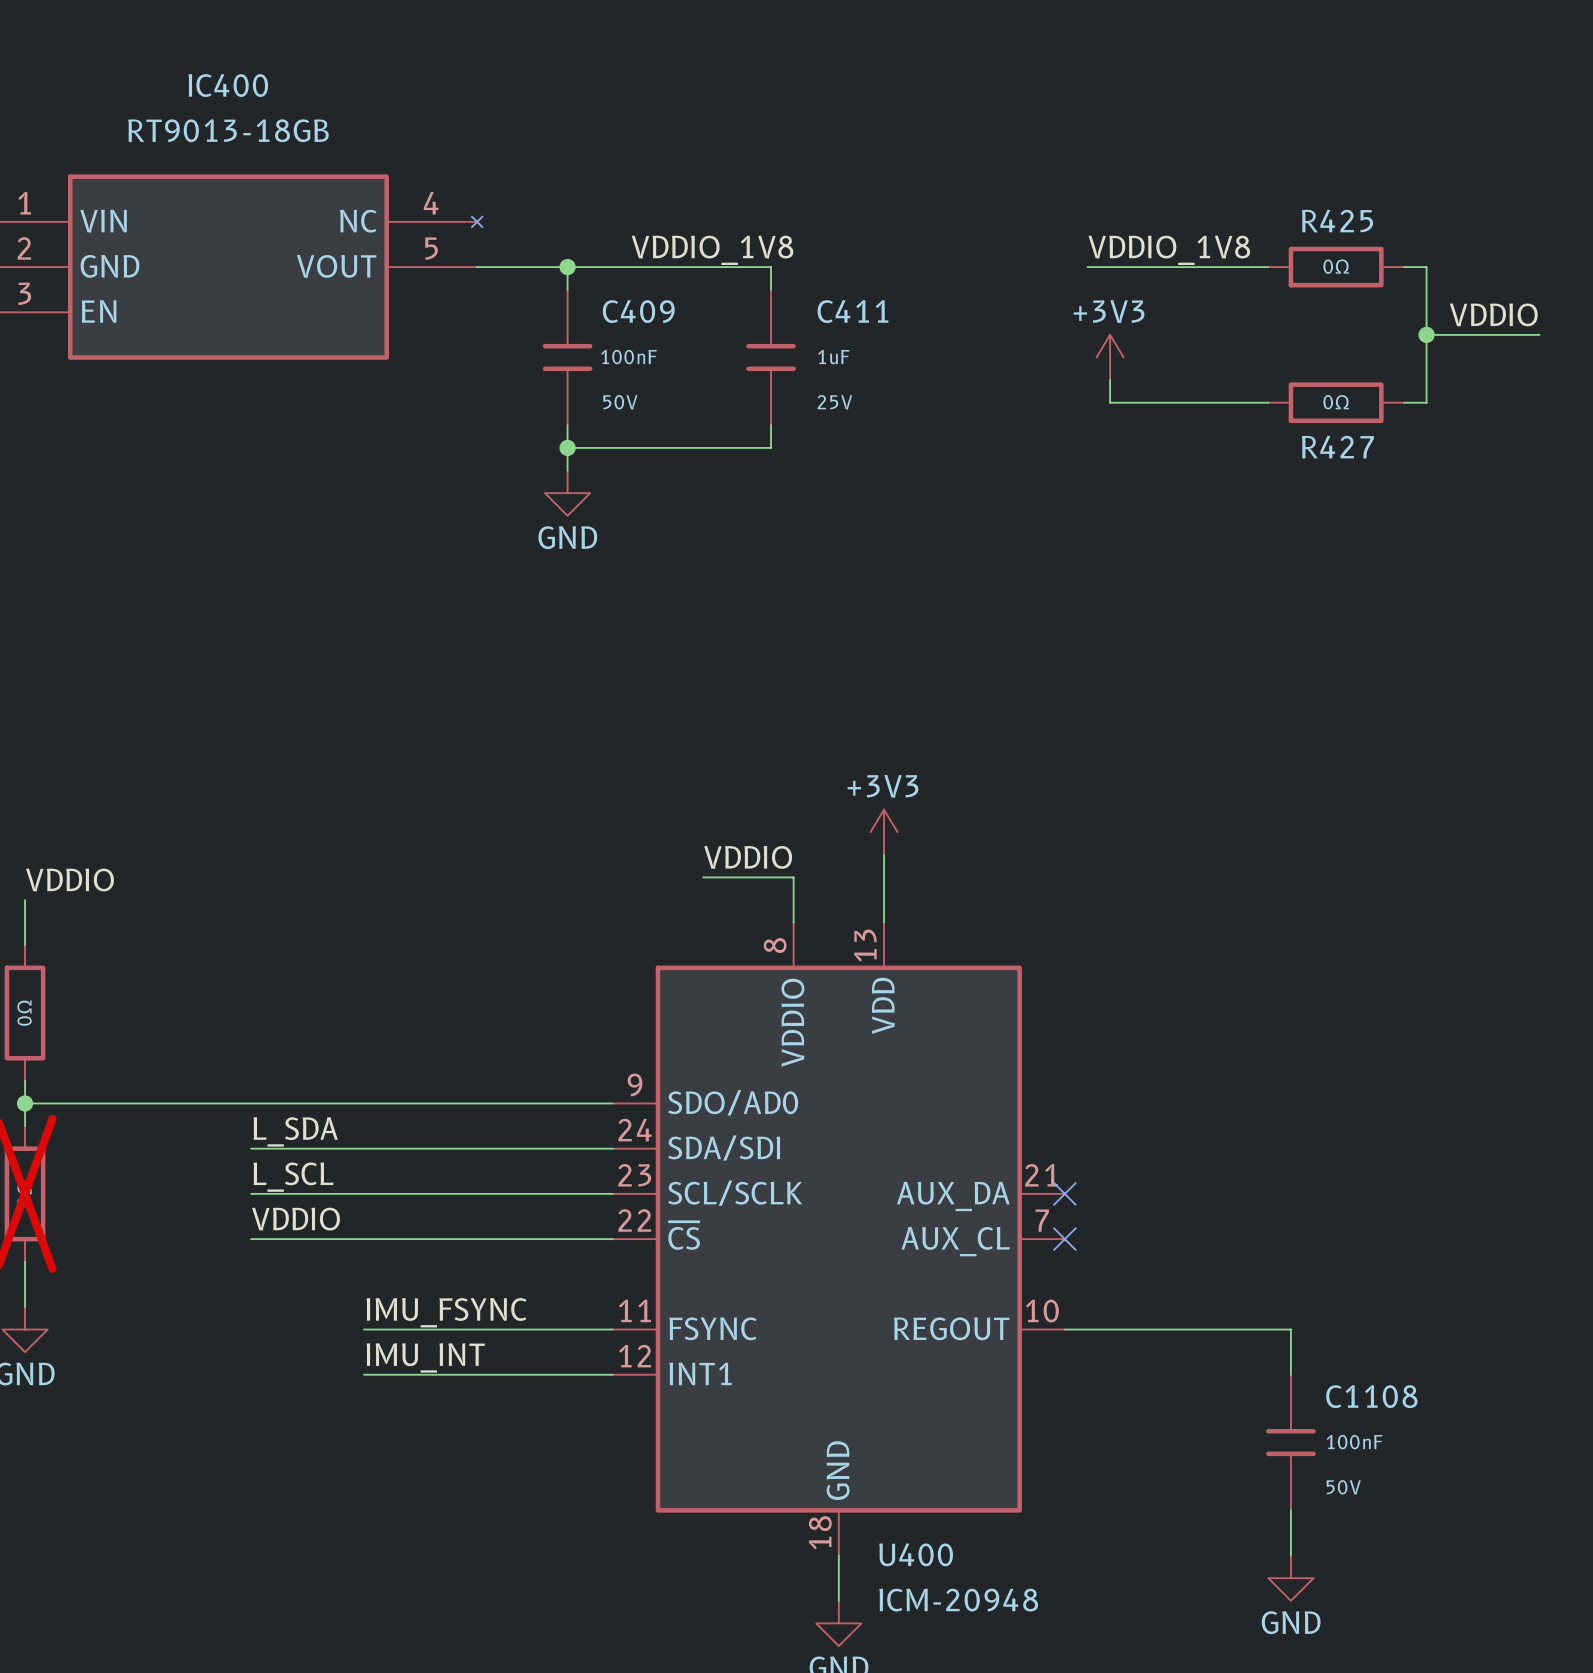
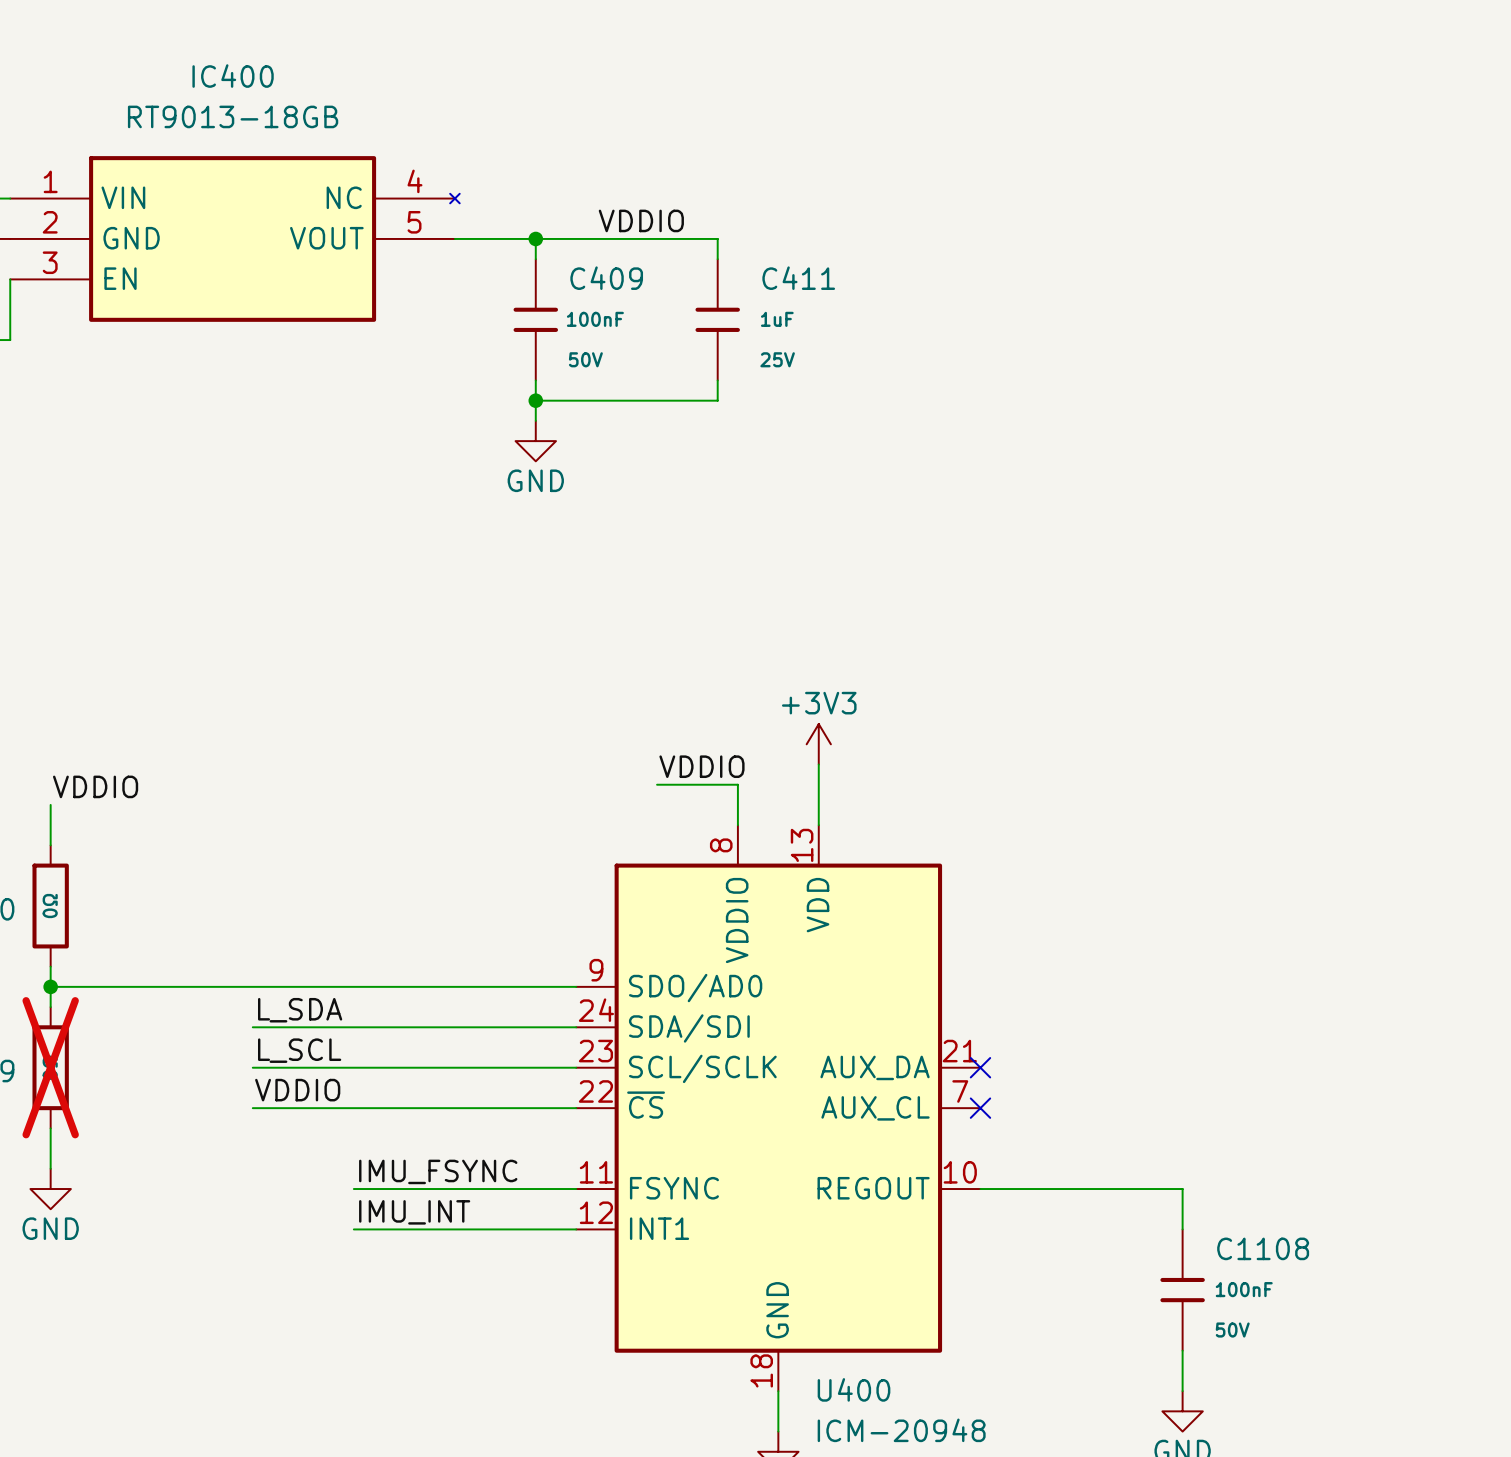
label: VDDIO_1V8 (712, 250) -> VDDIO (641, 220)
label: VDDIO_1V8 (1169, 250) -> none
wire: (1087, 267) (1268, 267) -> none
R425: 0Ω (1336, 267) -> none
wire: (1403, 267) (1426, 267) (1426, 402) (1403, 402) -> none
label: VDDIO (1493, 314) -> none
wire: (1426, 334) (1539, 334) -> none
junction: (1426, 334) -> none
power symbol: +3V3 (1110, 357) -> none
wire: (1110, 380) (1110, 402) (1268, 402) -> none
R427: 0Ω (1336, 402) -> none

